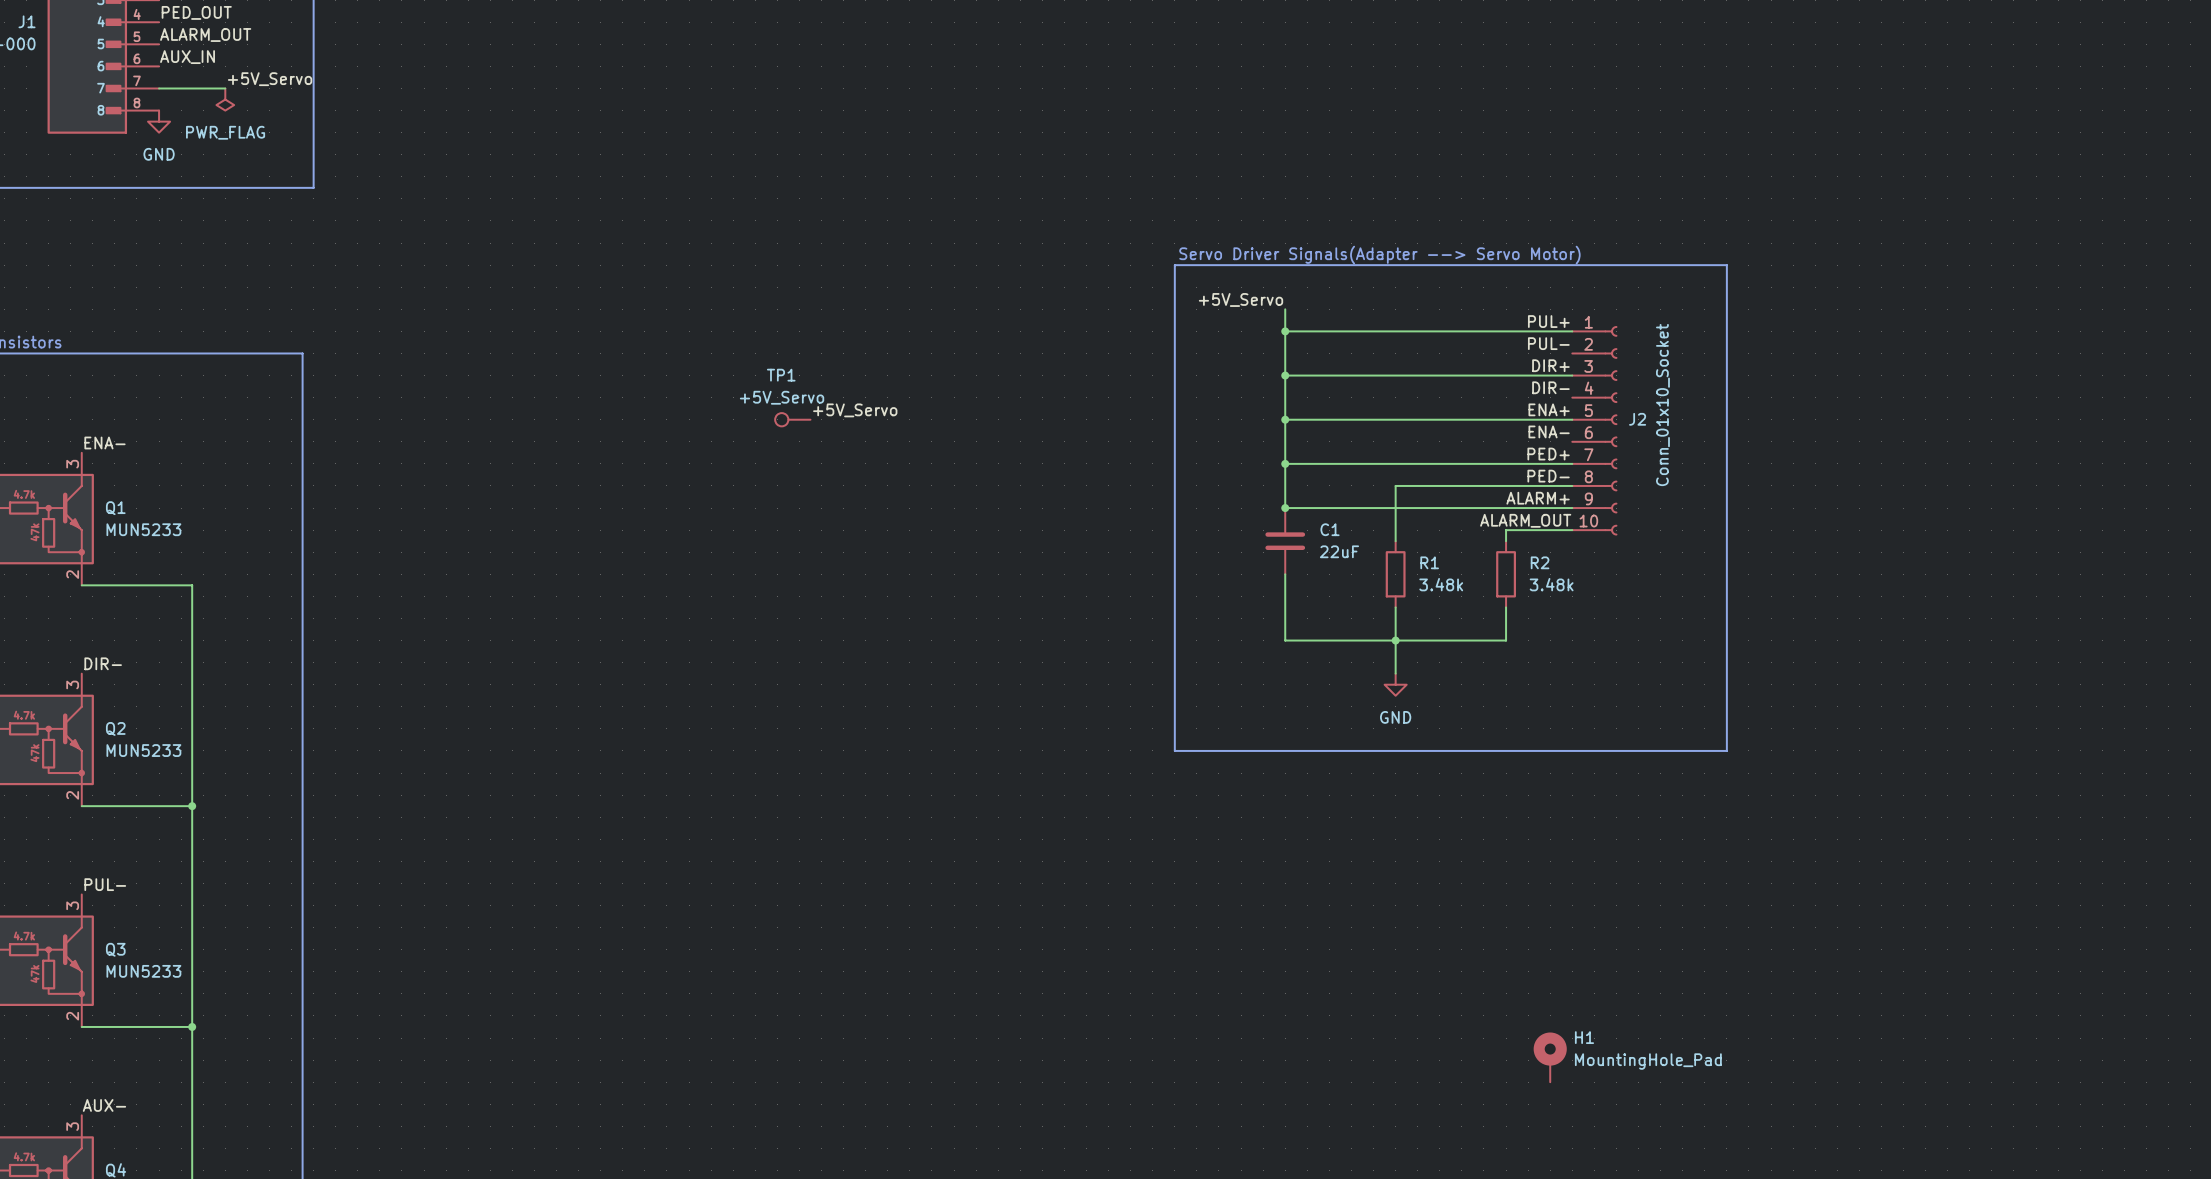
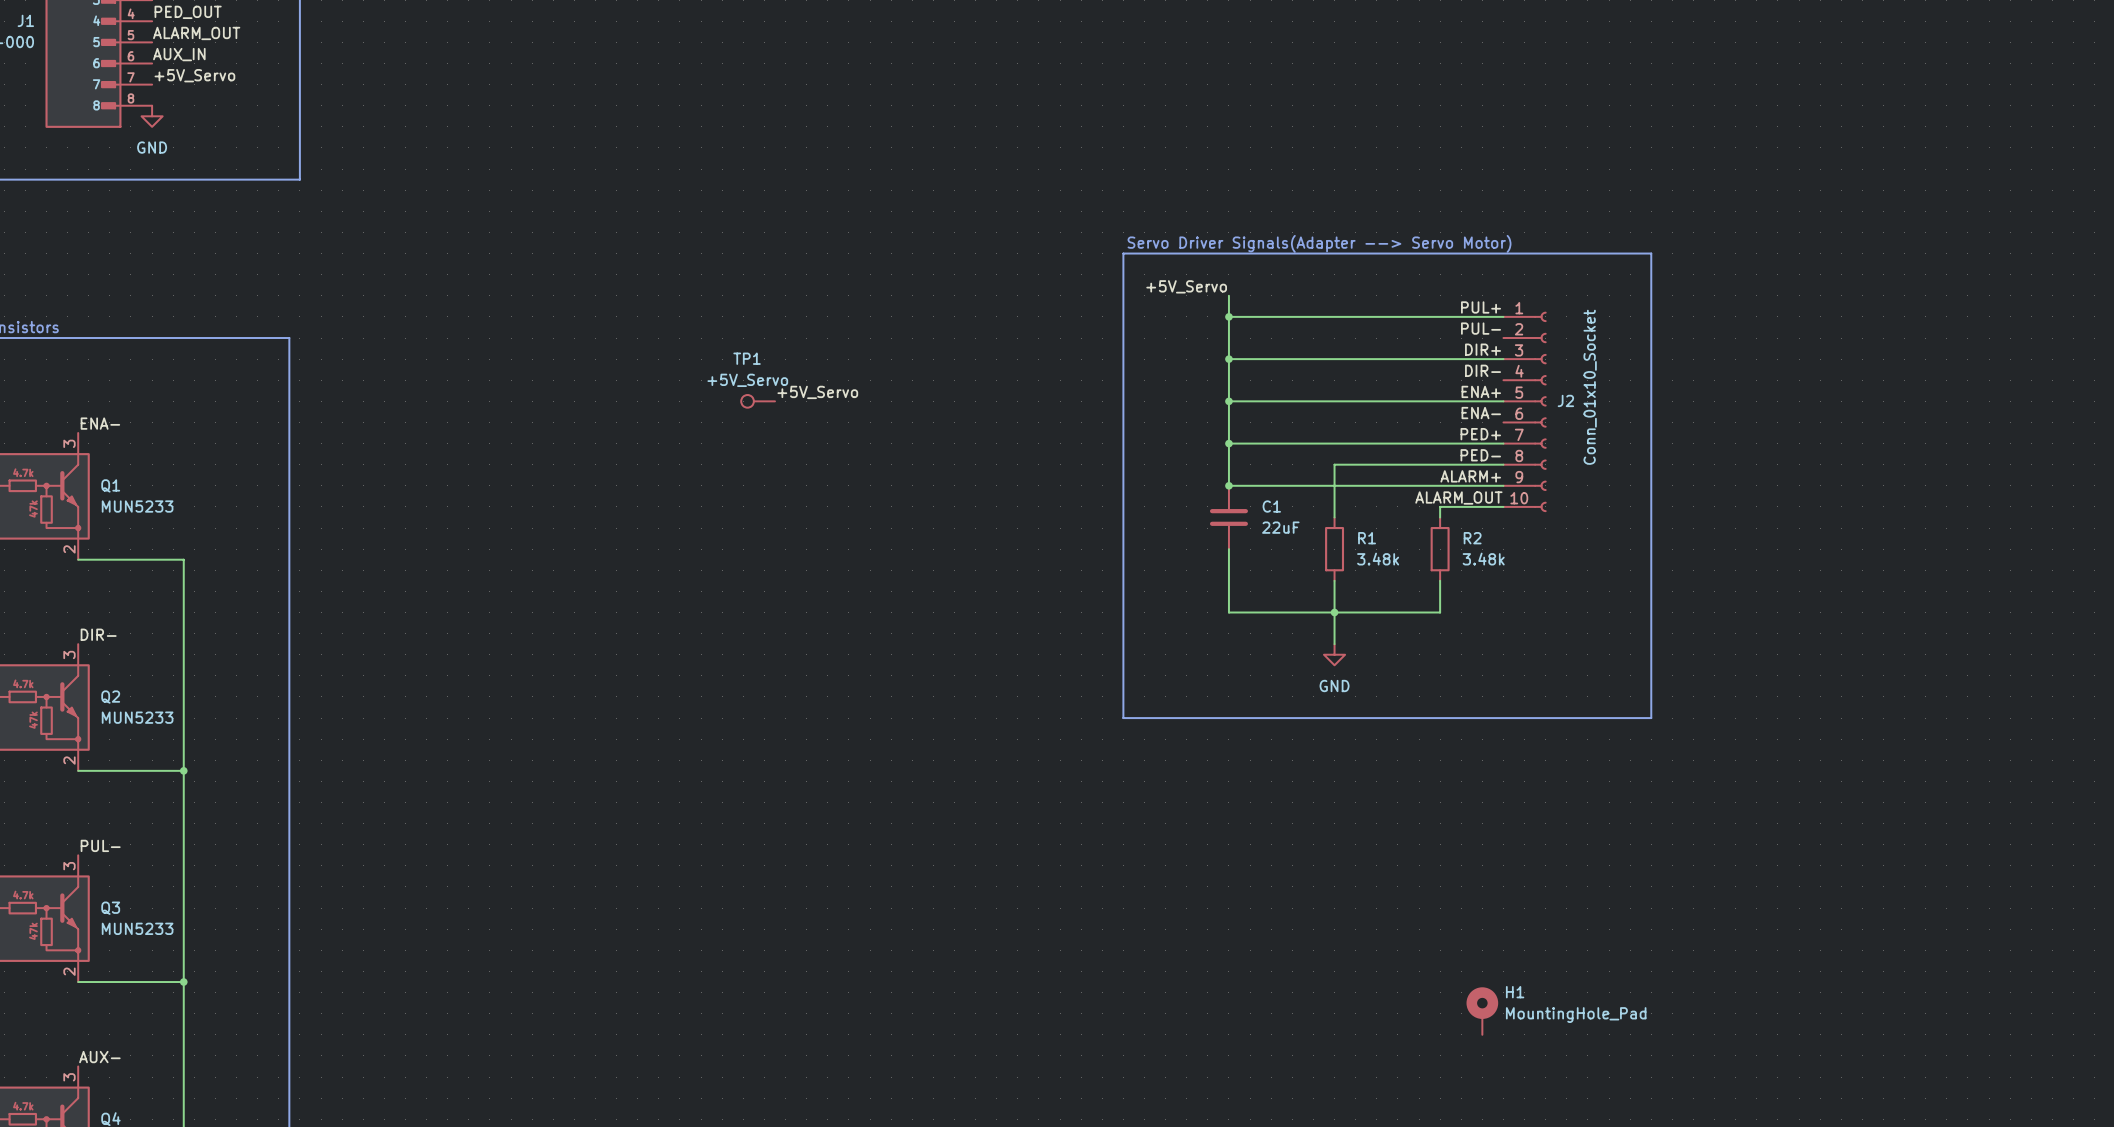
label position: +5V_Servo (270, 79) -> +5V_Servo (194, 75)
wire: (159, 88) (225, 88) -> none
power symbol: PWR_FLAG (225, 99) -> none

